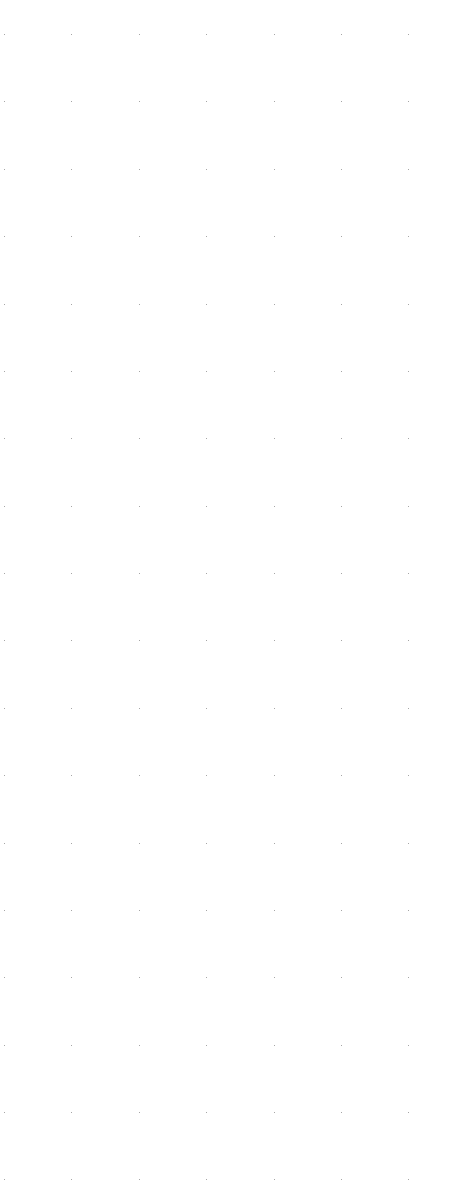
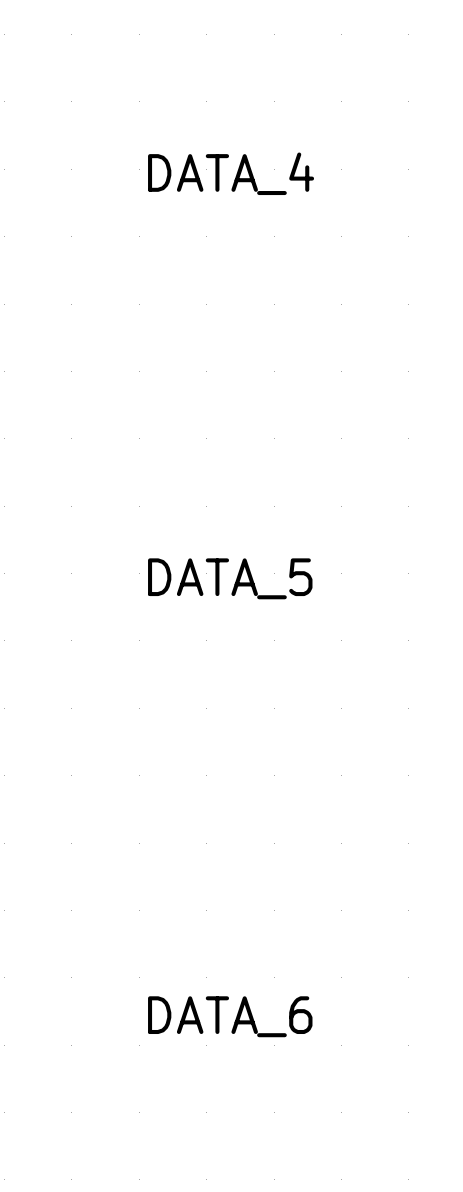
label: none -> DATA_4 (231, 173)
label: none -> DATA_5 (230, 578)
label: none -> DATA_6 (230, 1016)

